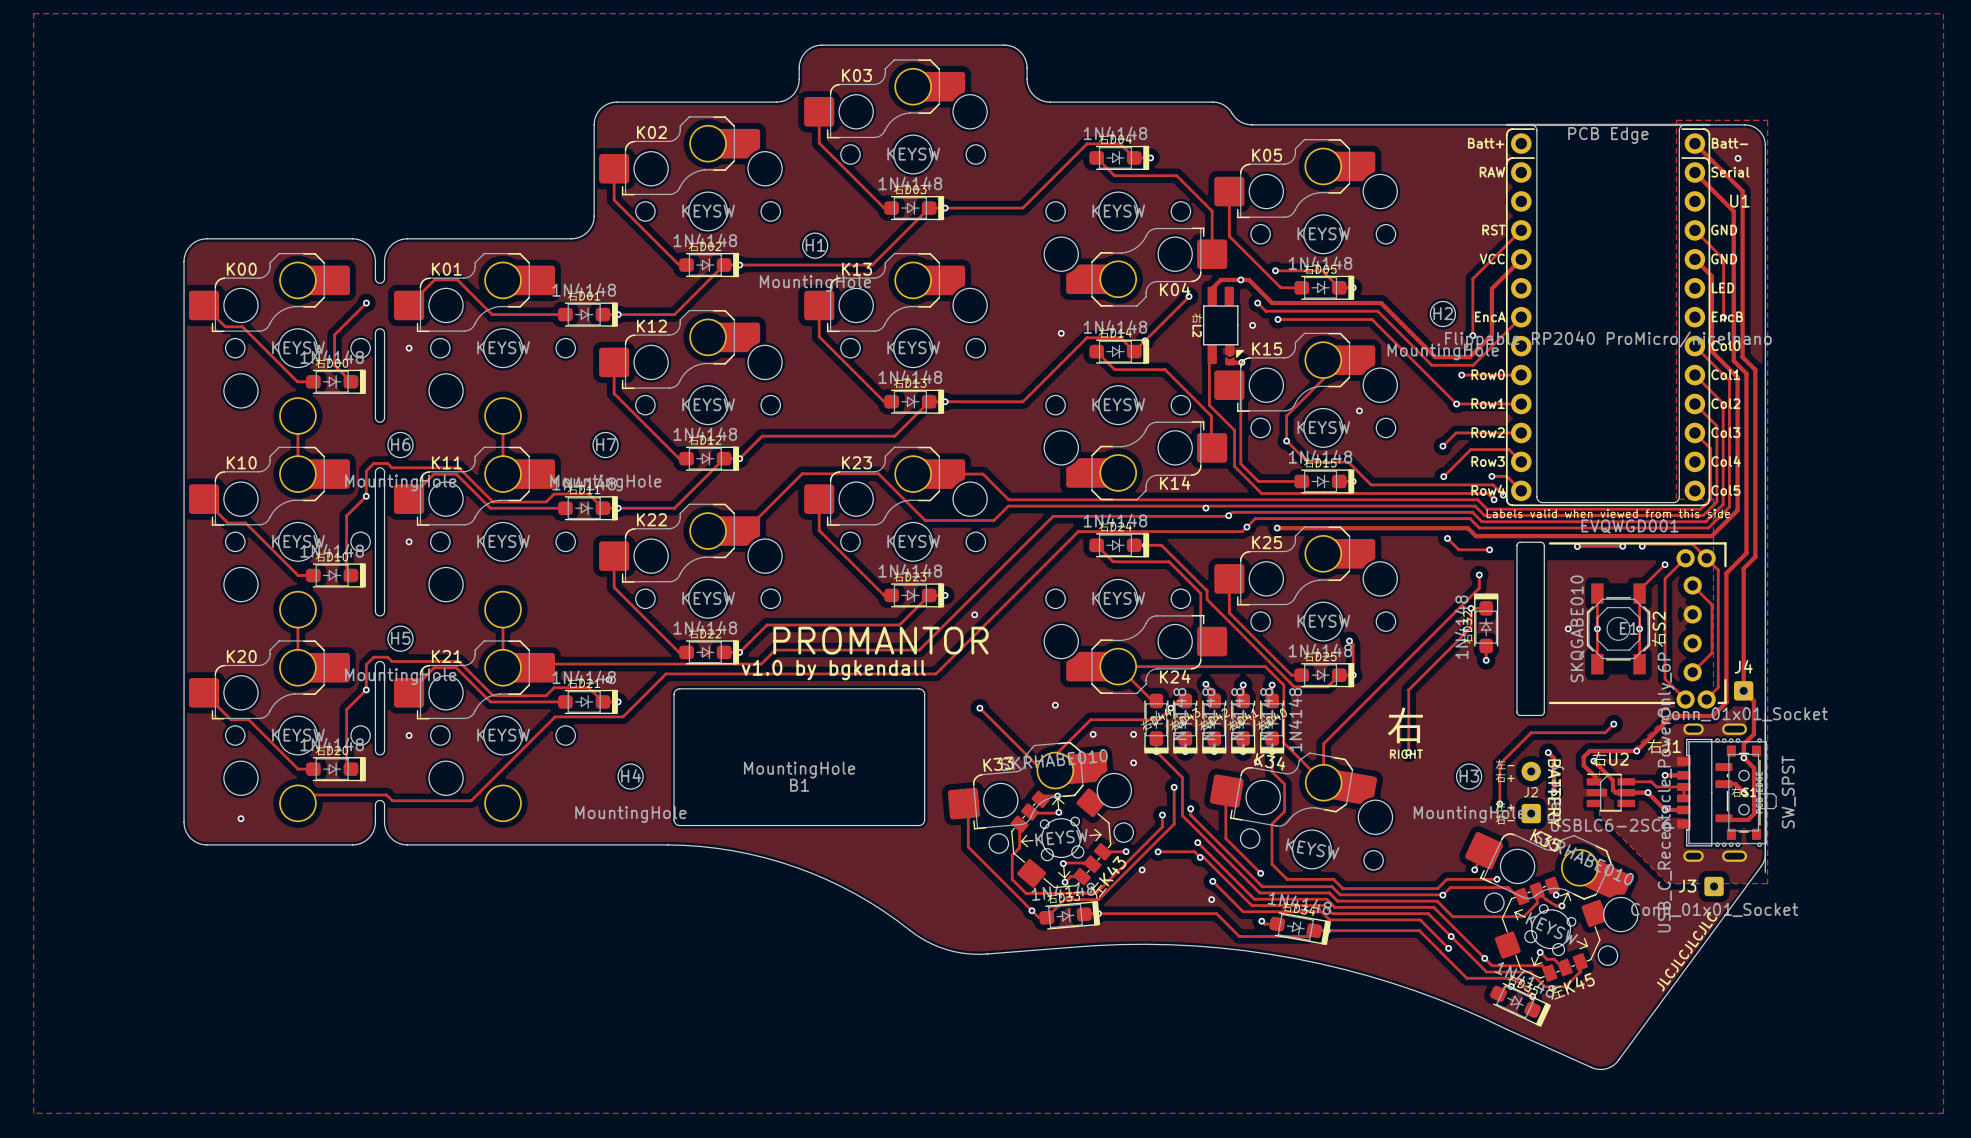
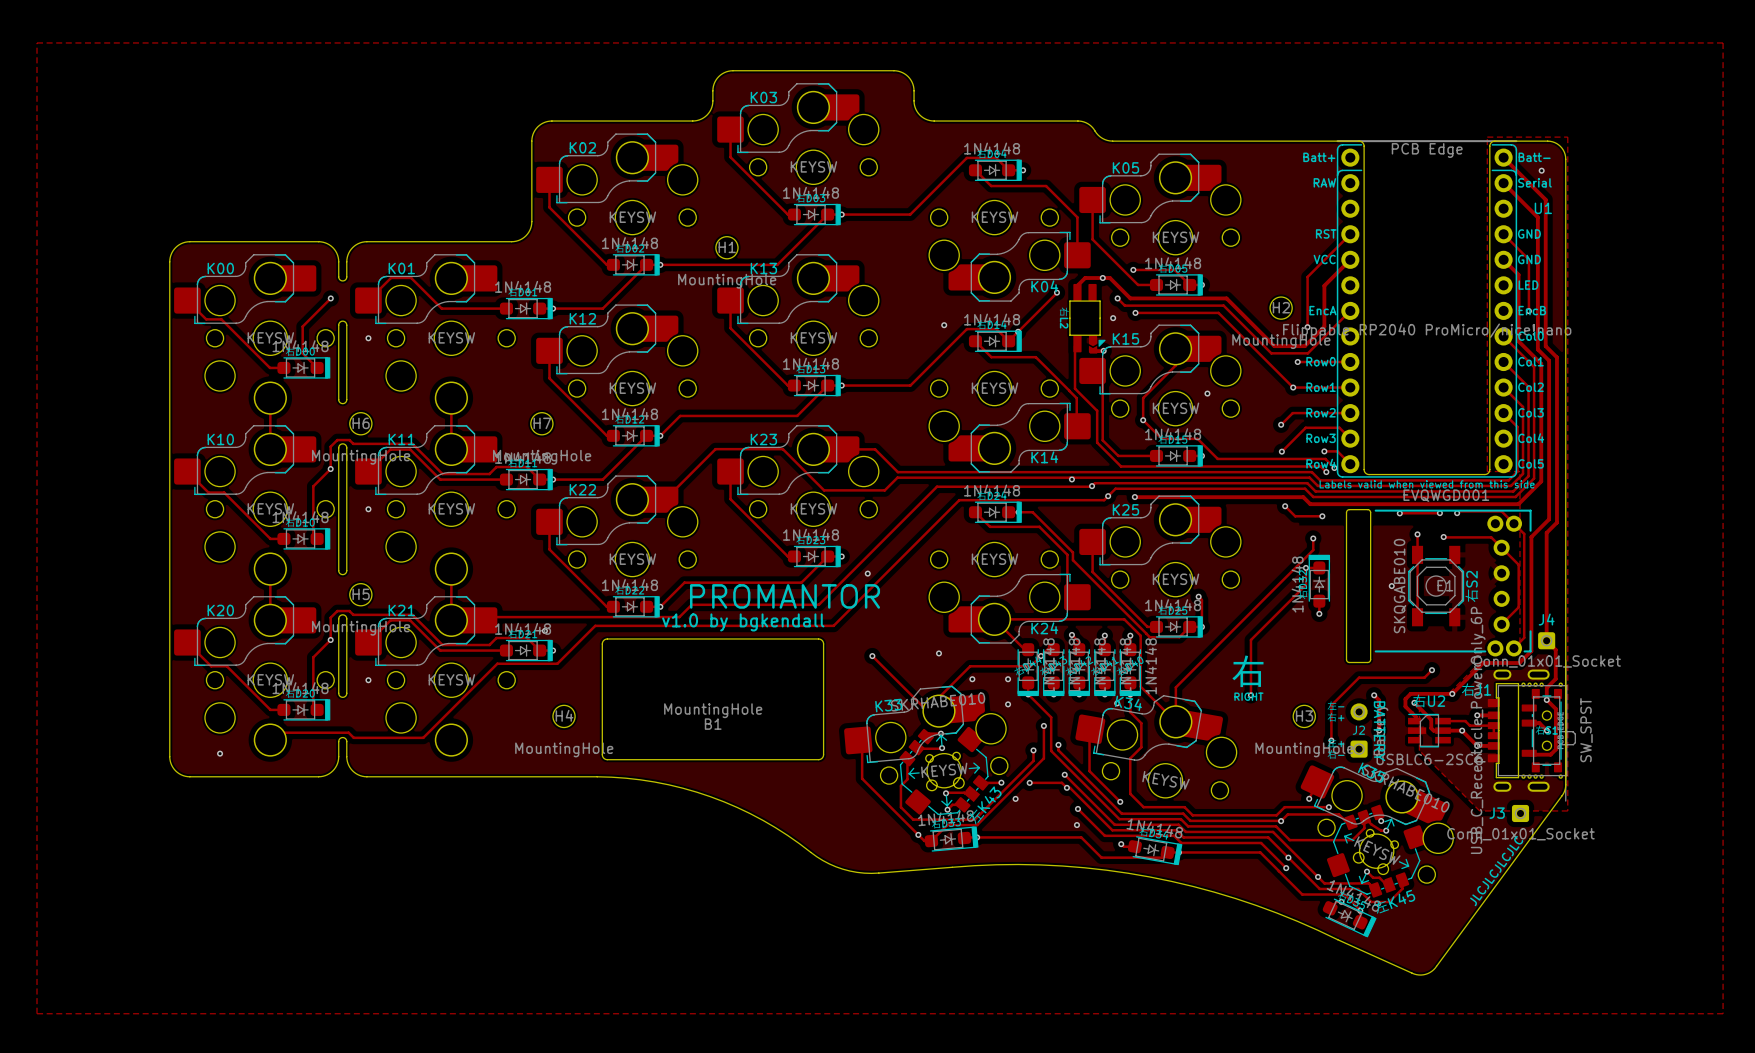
track: (1685, 558) (1665, 578) (1665, 679) (1685, 699) -> none
track: (1665, 564) (1639, 590) -> none
via: (1665, 564) -> none
track: none -> (1417, 534) (1417, 554)
via: none -> (1417, 534)
track: none -> (1443, 537) (1491, 537) (1501, 547)
via: none -> (1443, 537)
track: (1639, 593) (1639, 664) -> none
via: (1597, 628) -> none
via: (1639, 628) -> none

